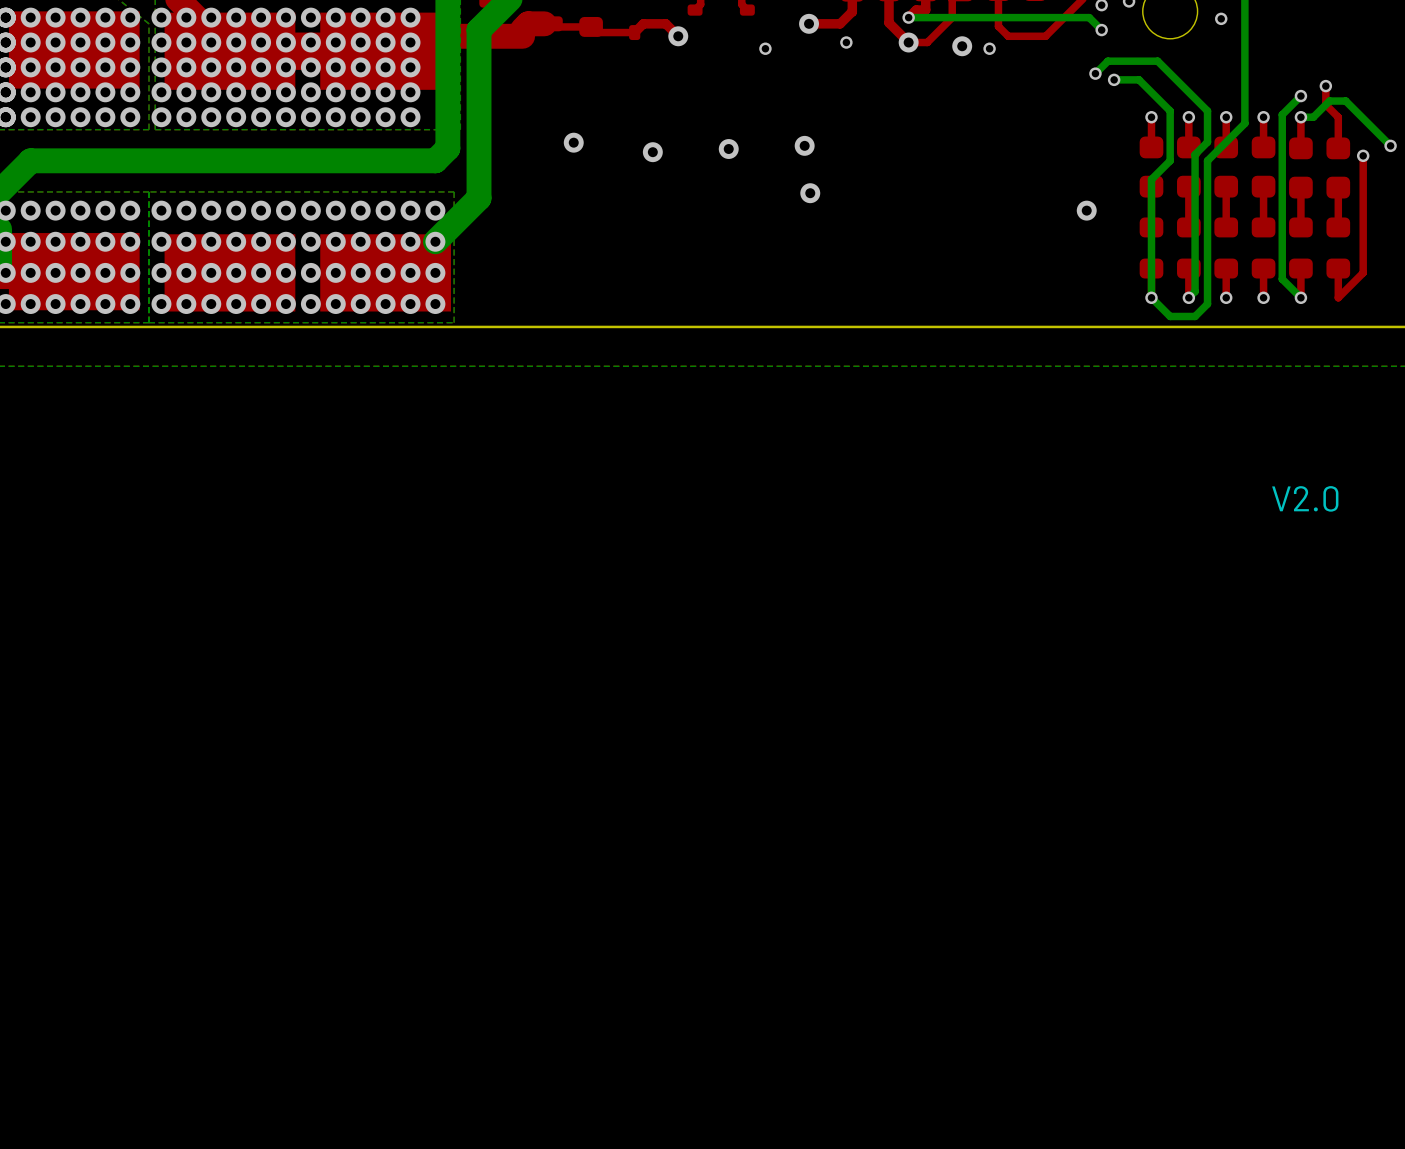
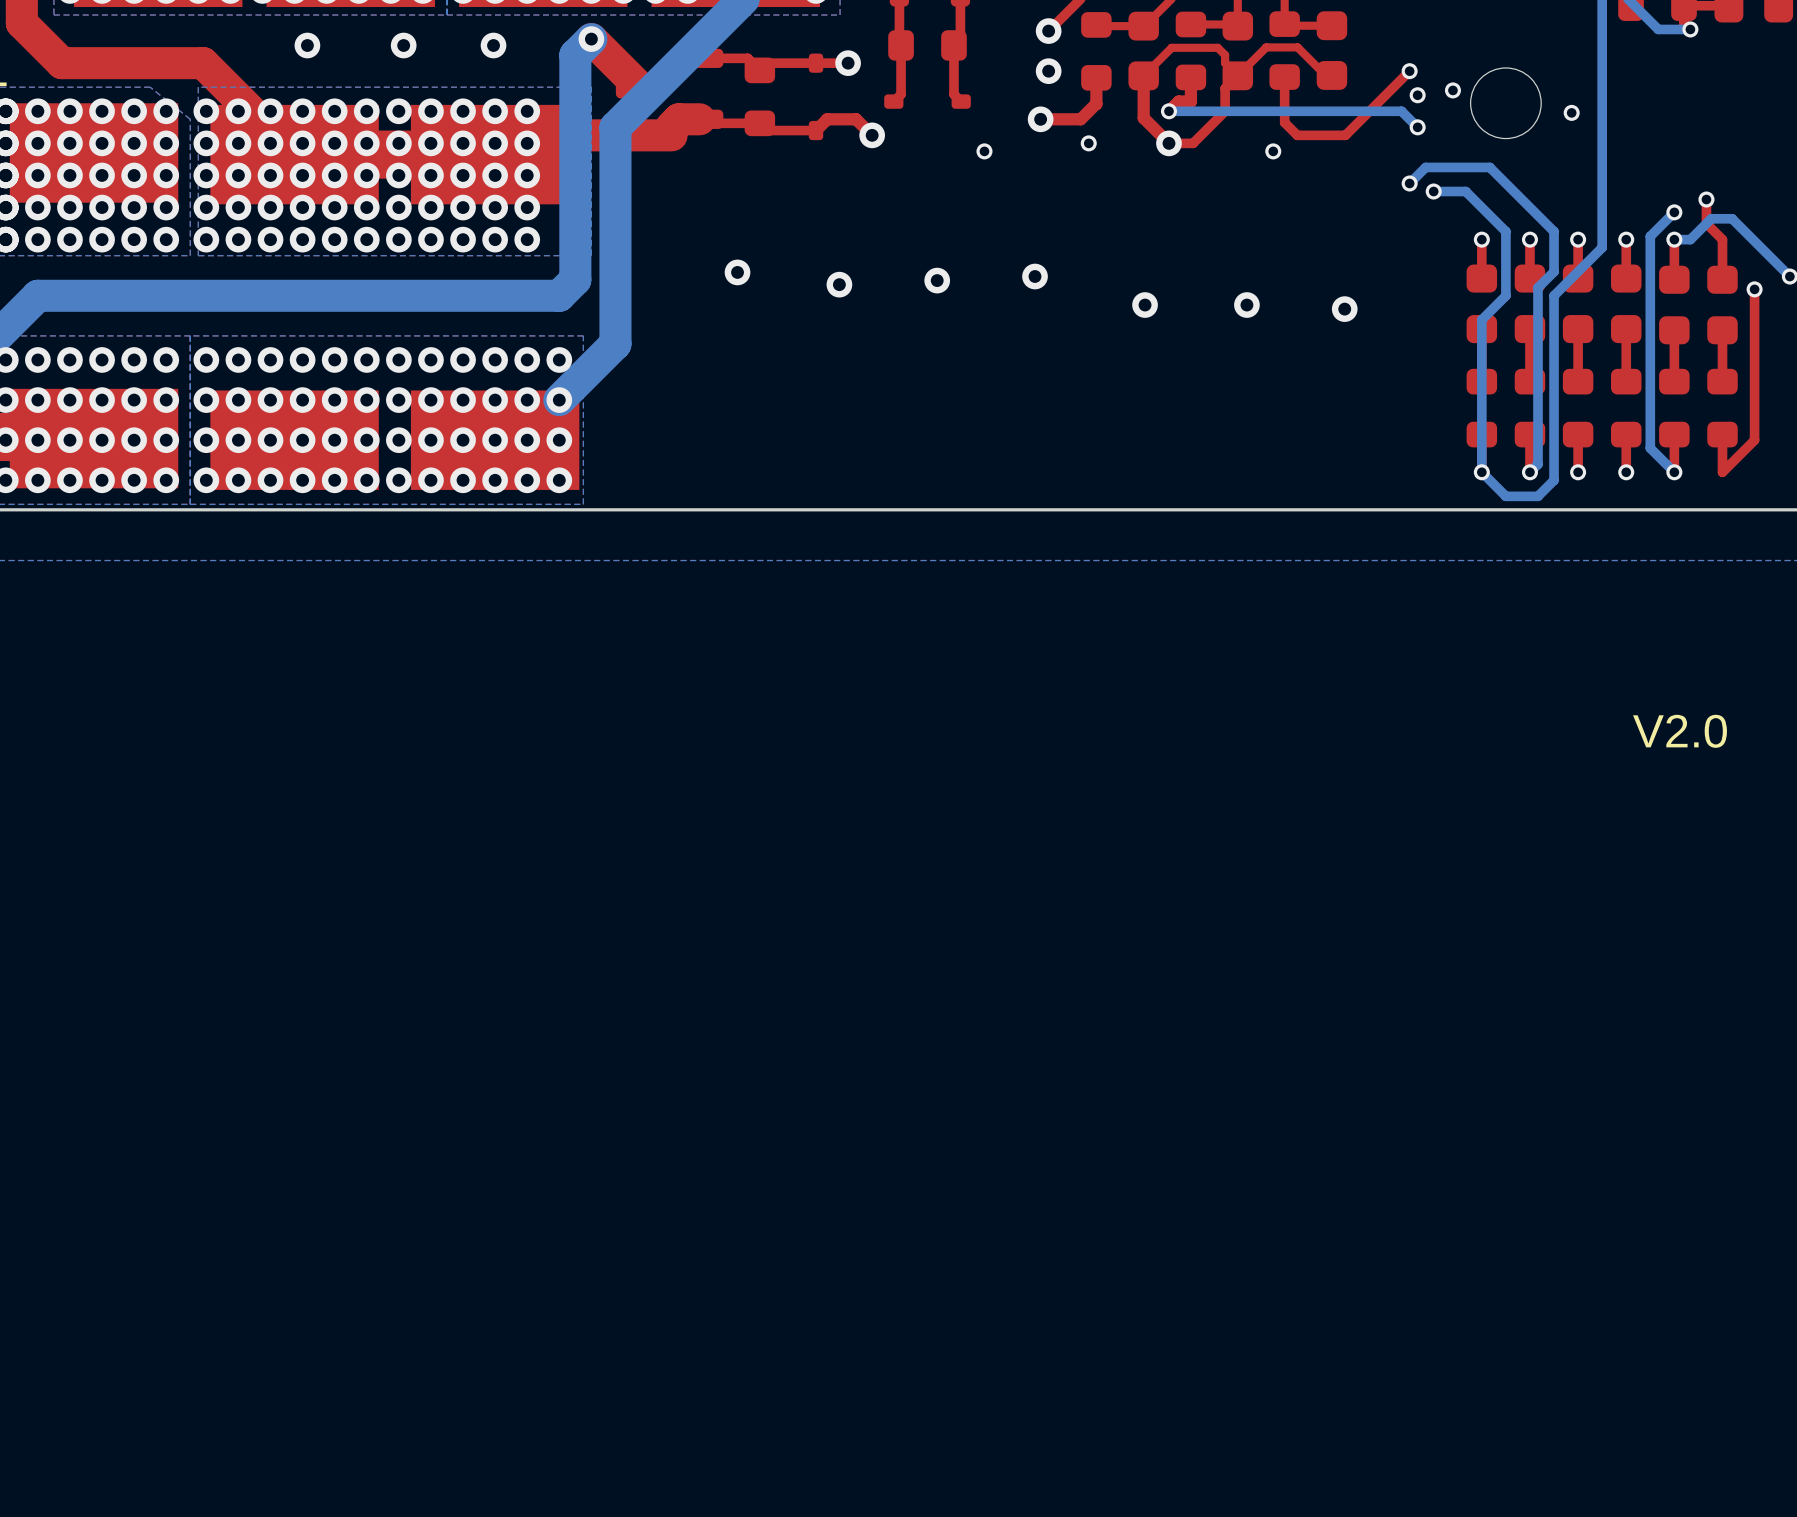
via: (962, 46) -> none
via: none -> (1145, 305)
via: none -> (1246, 305)
via: (810, 193) -> none
via position: (1086, 210) -> (1344, 309)

